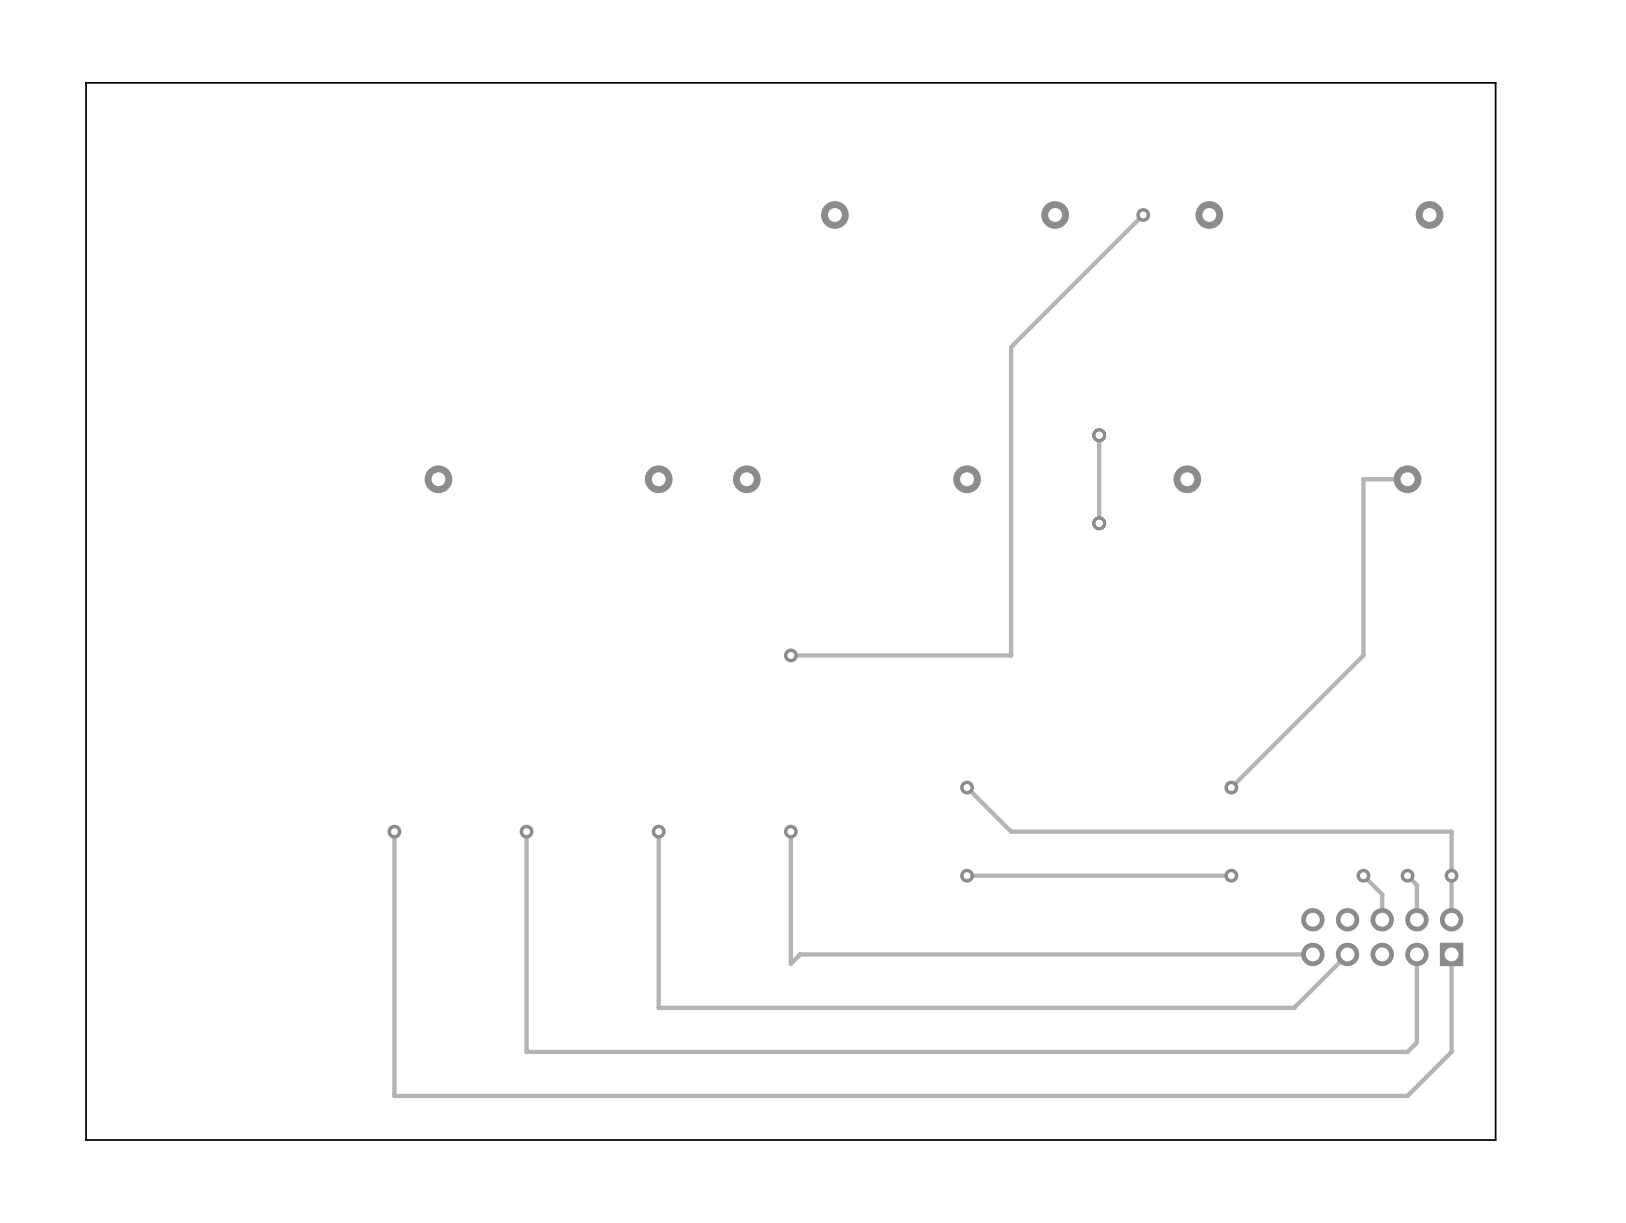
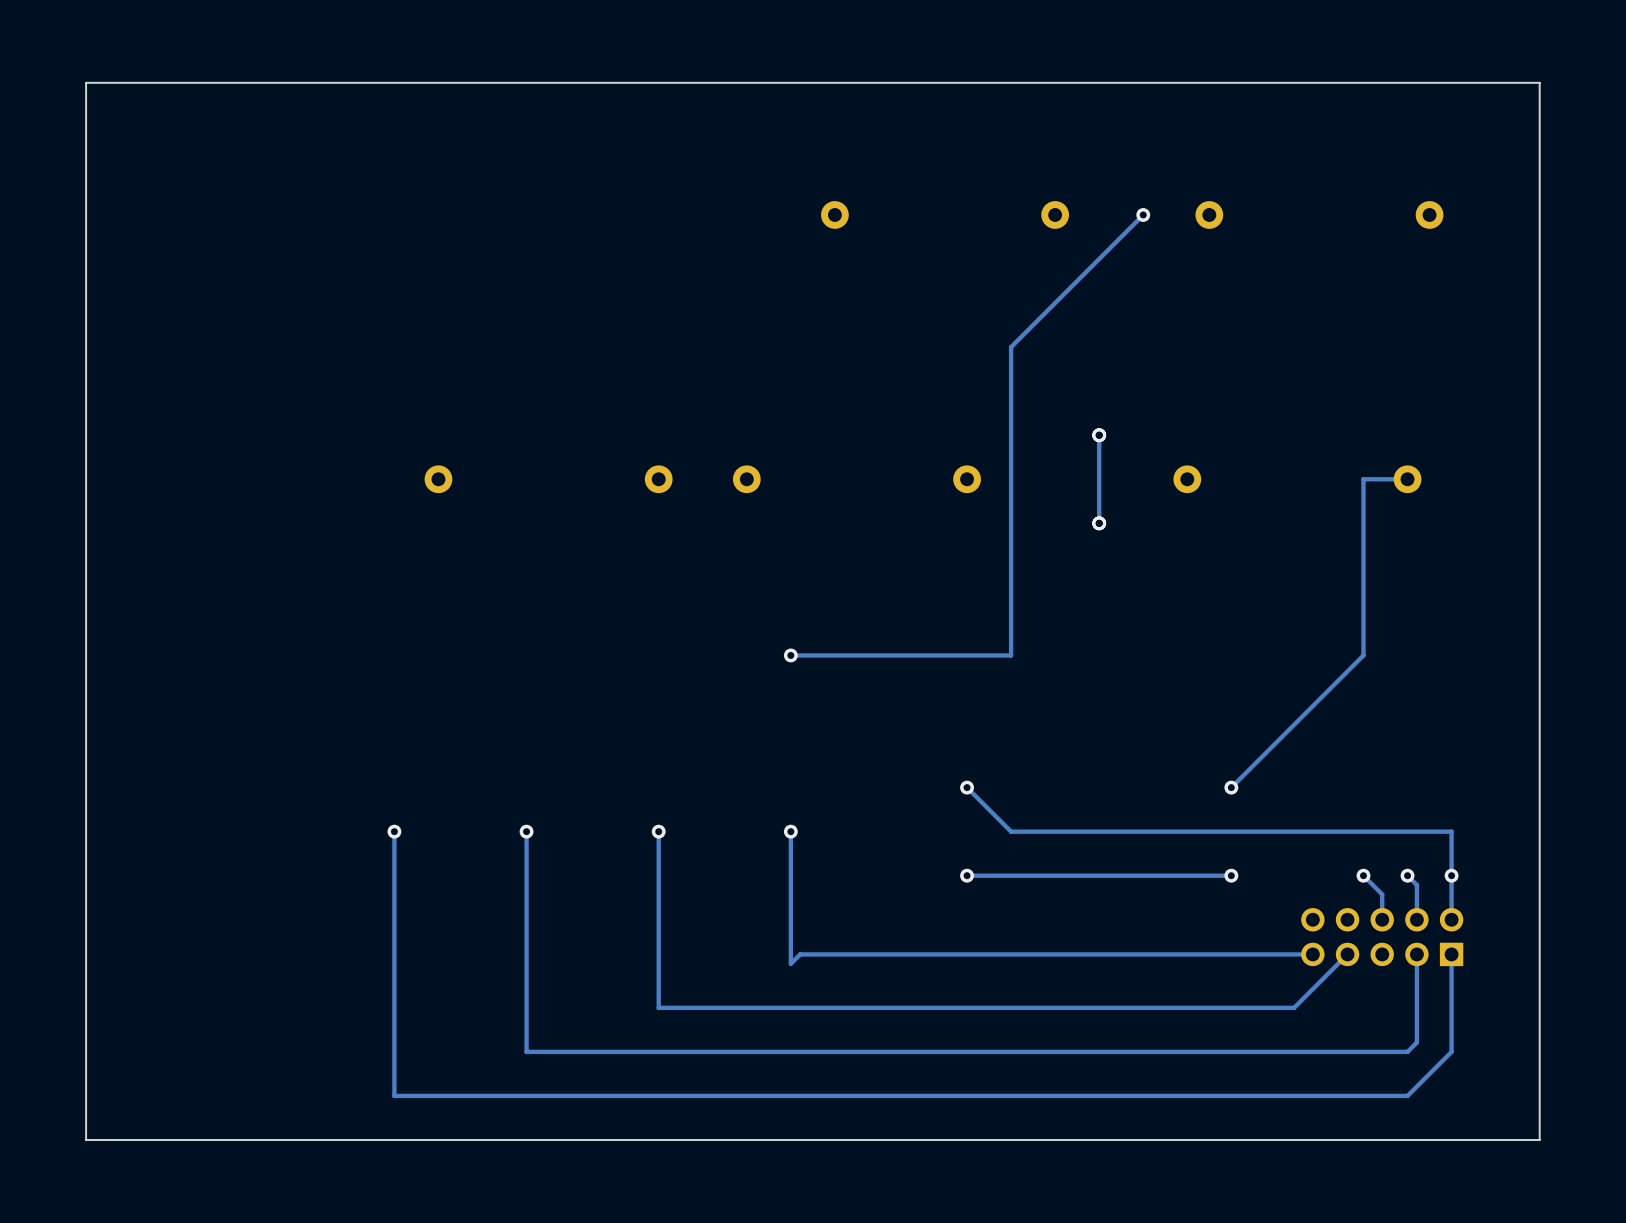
board edge: (1495, 82) (1495, 1139) -> (1495, 82) (1539, 82) (1539, 1139) (1495, 1139)

